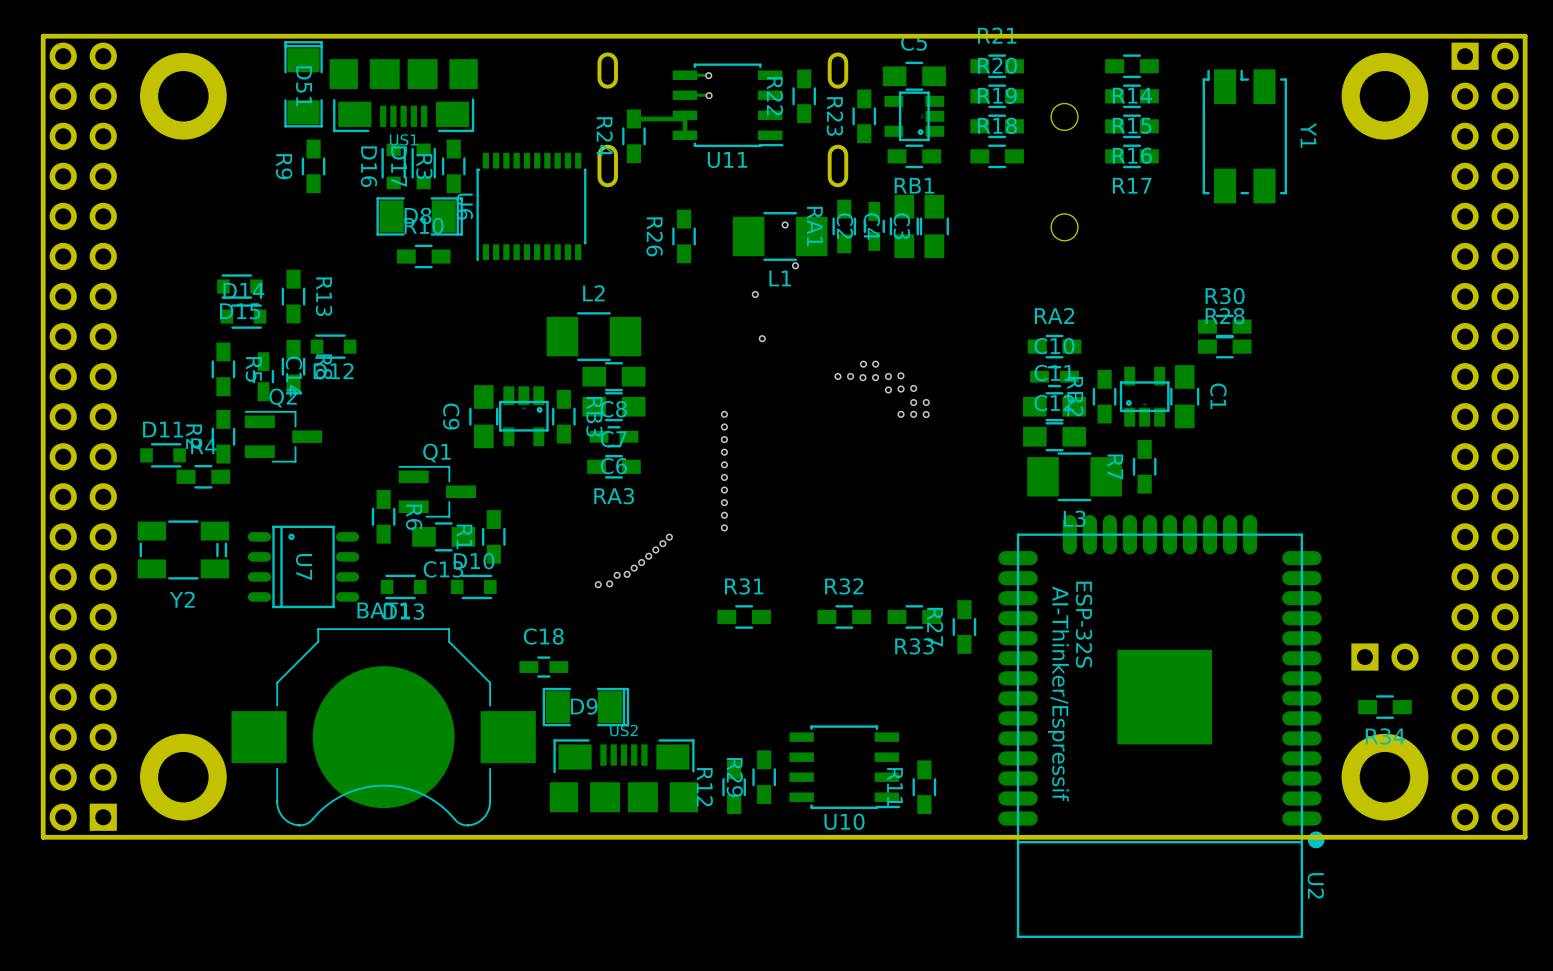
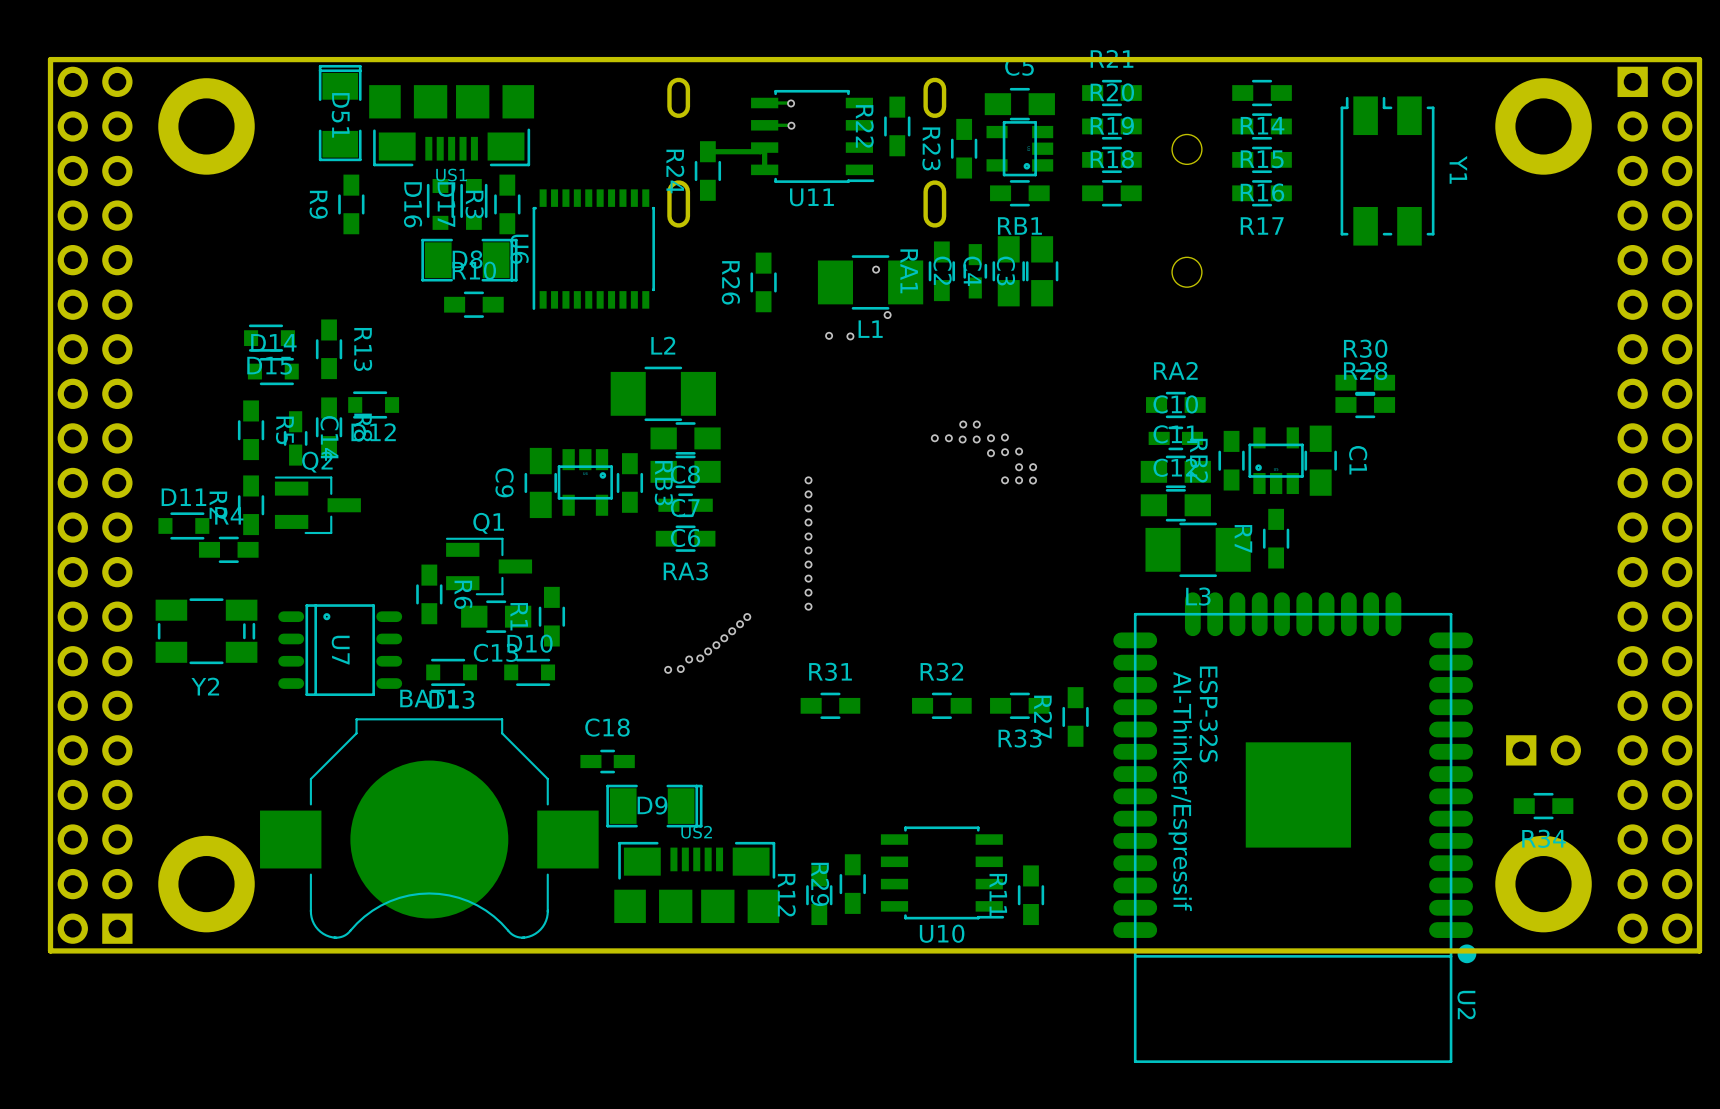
via: none -> (829, 335)
via: none -> (850, 336)
via: (755, 294) -> none
via: (762, 338) -> none

